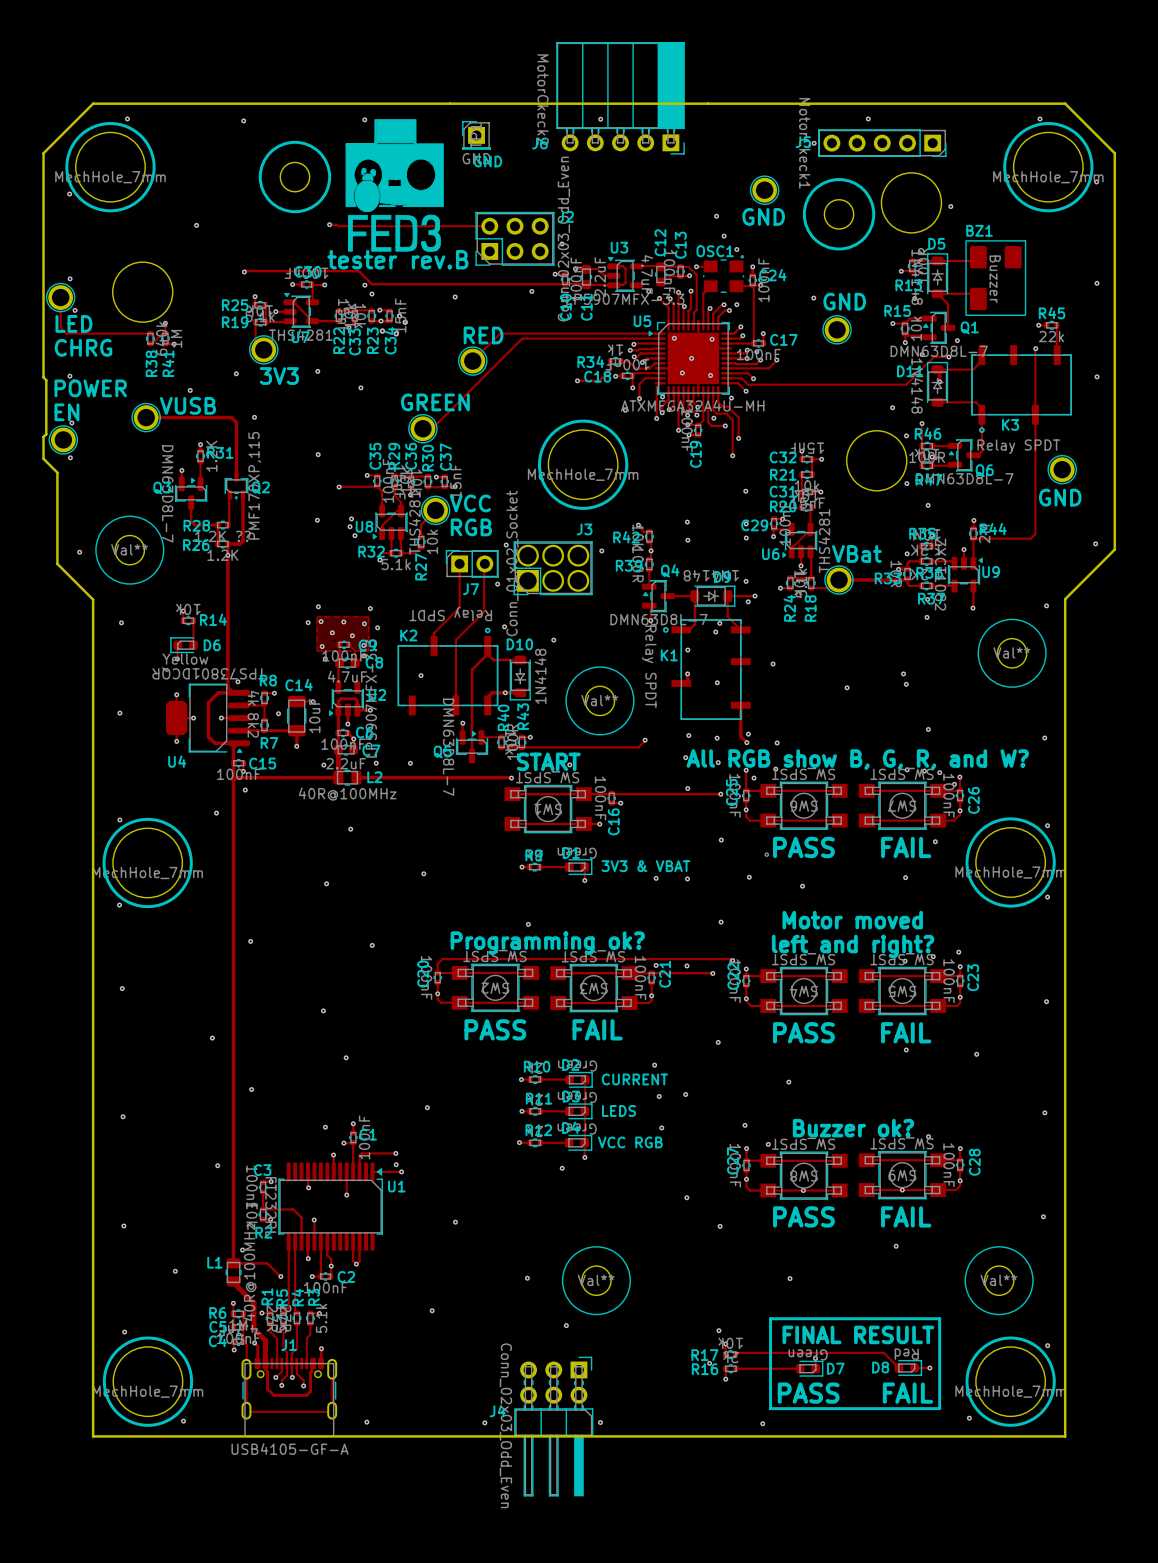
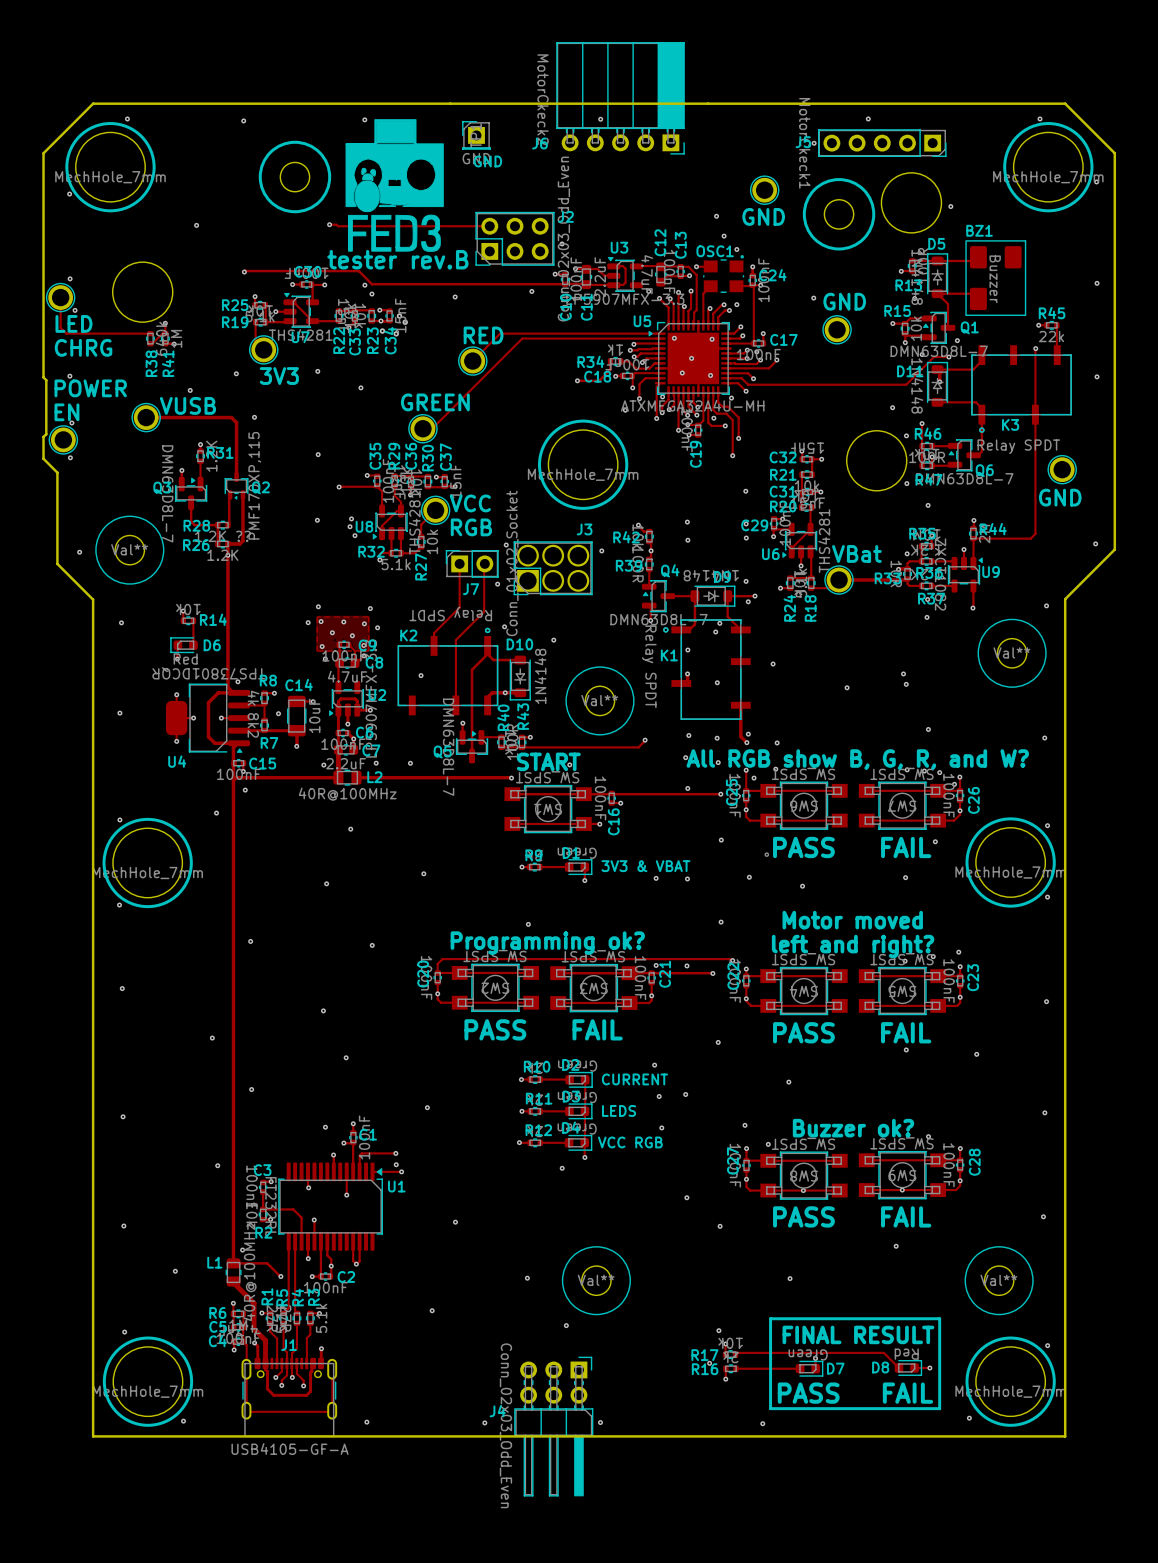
D6 value: Yellow (185, 658) -> Red (185, 658)

